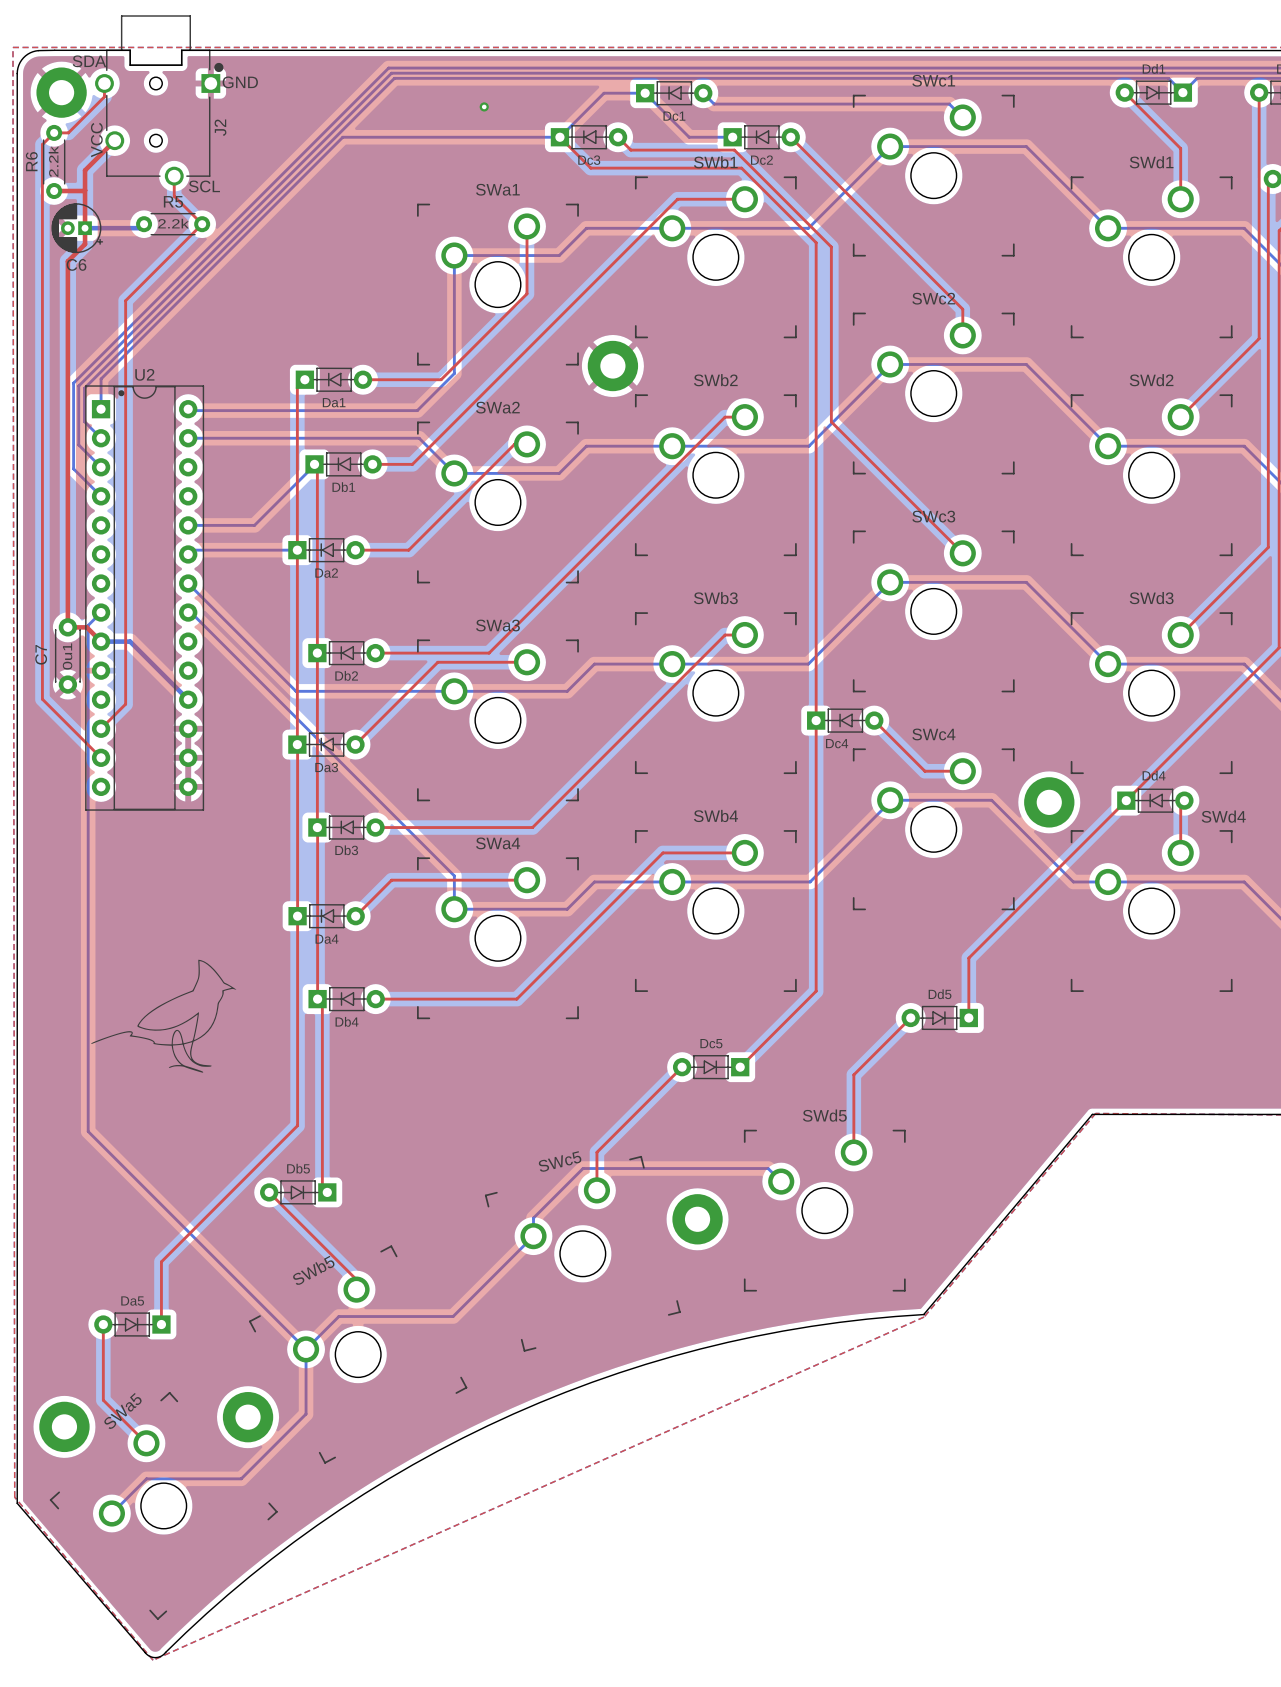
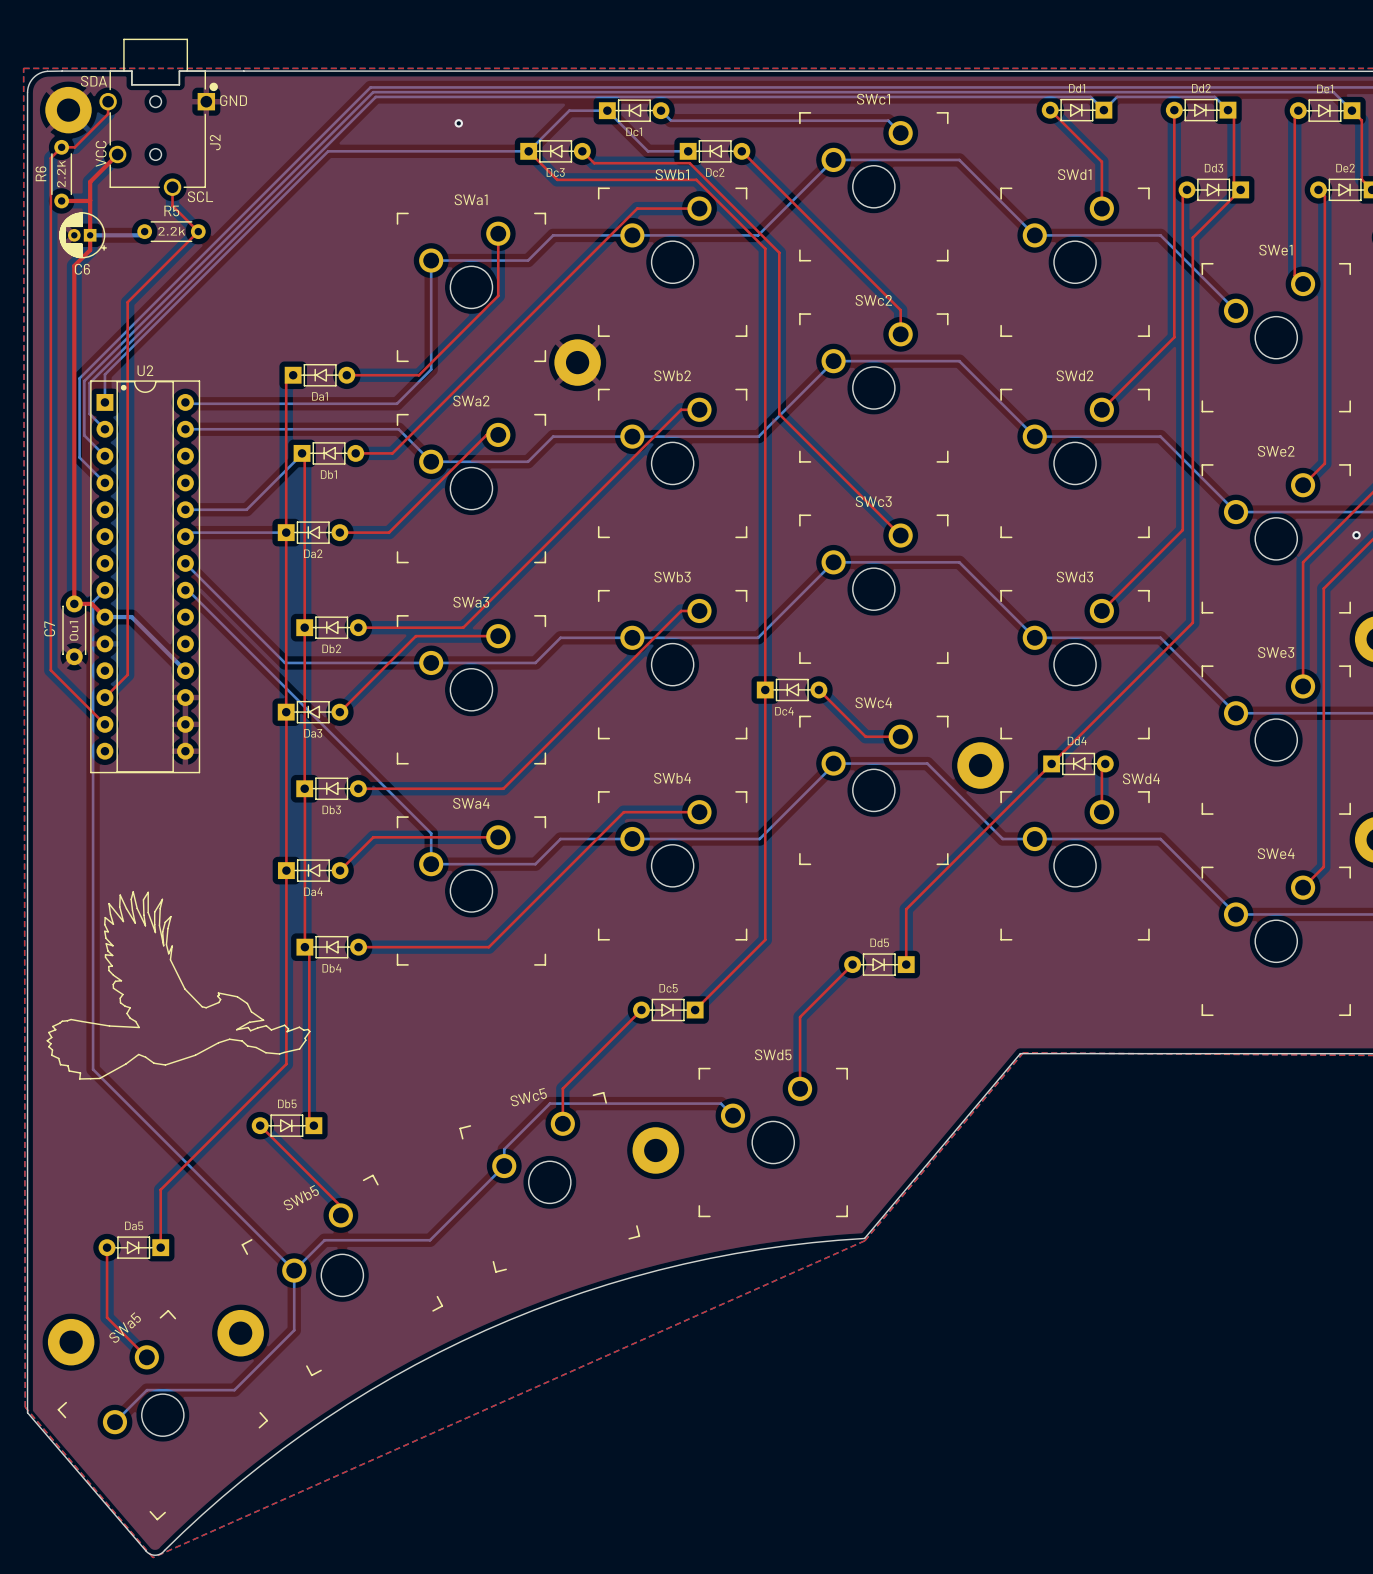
drawing: none -> [46, 891, 311, 1080]
drawing: [91, 959, 237, 1073] -> none

